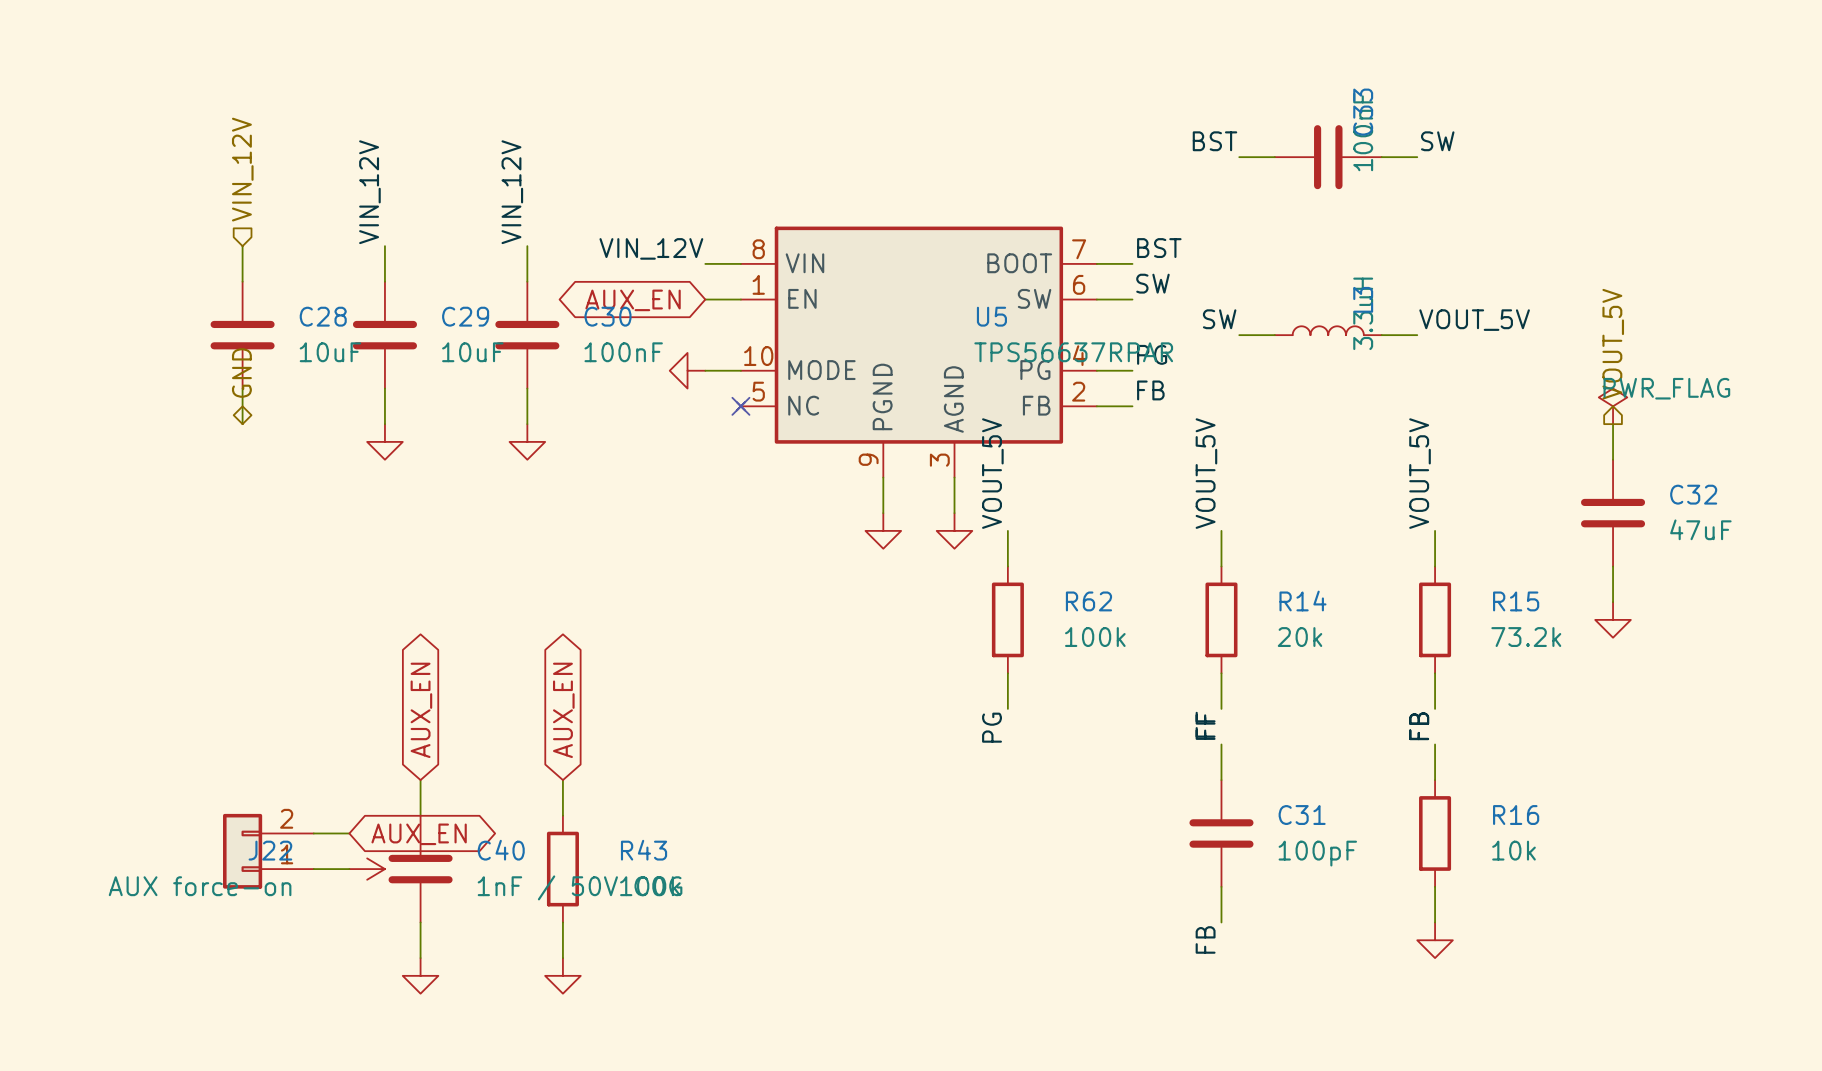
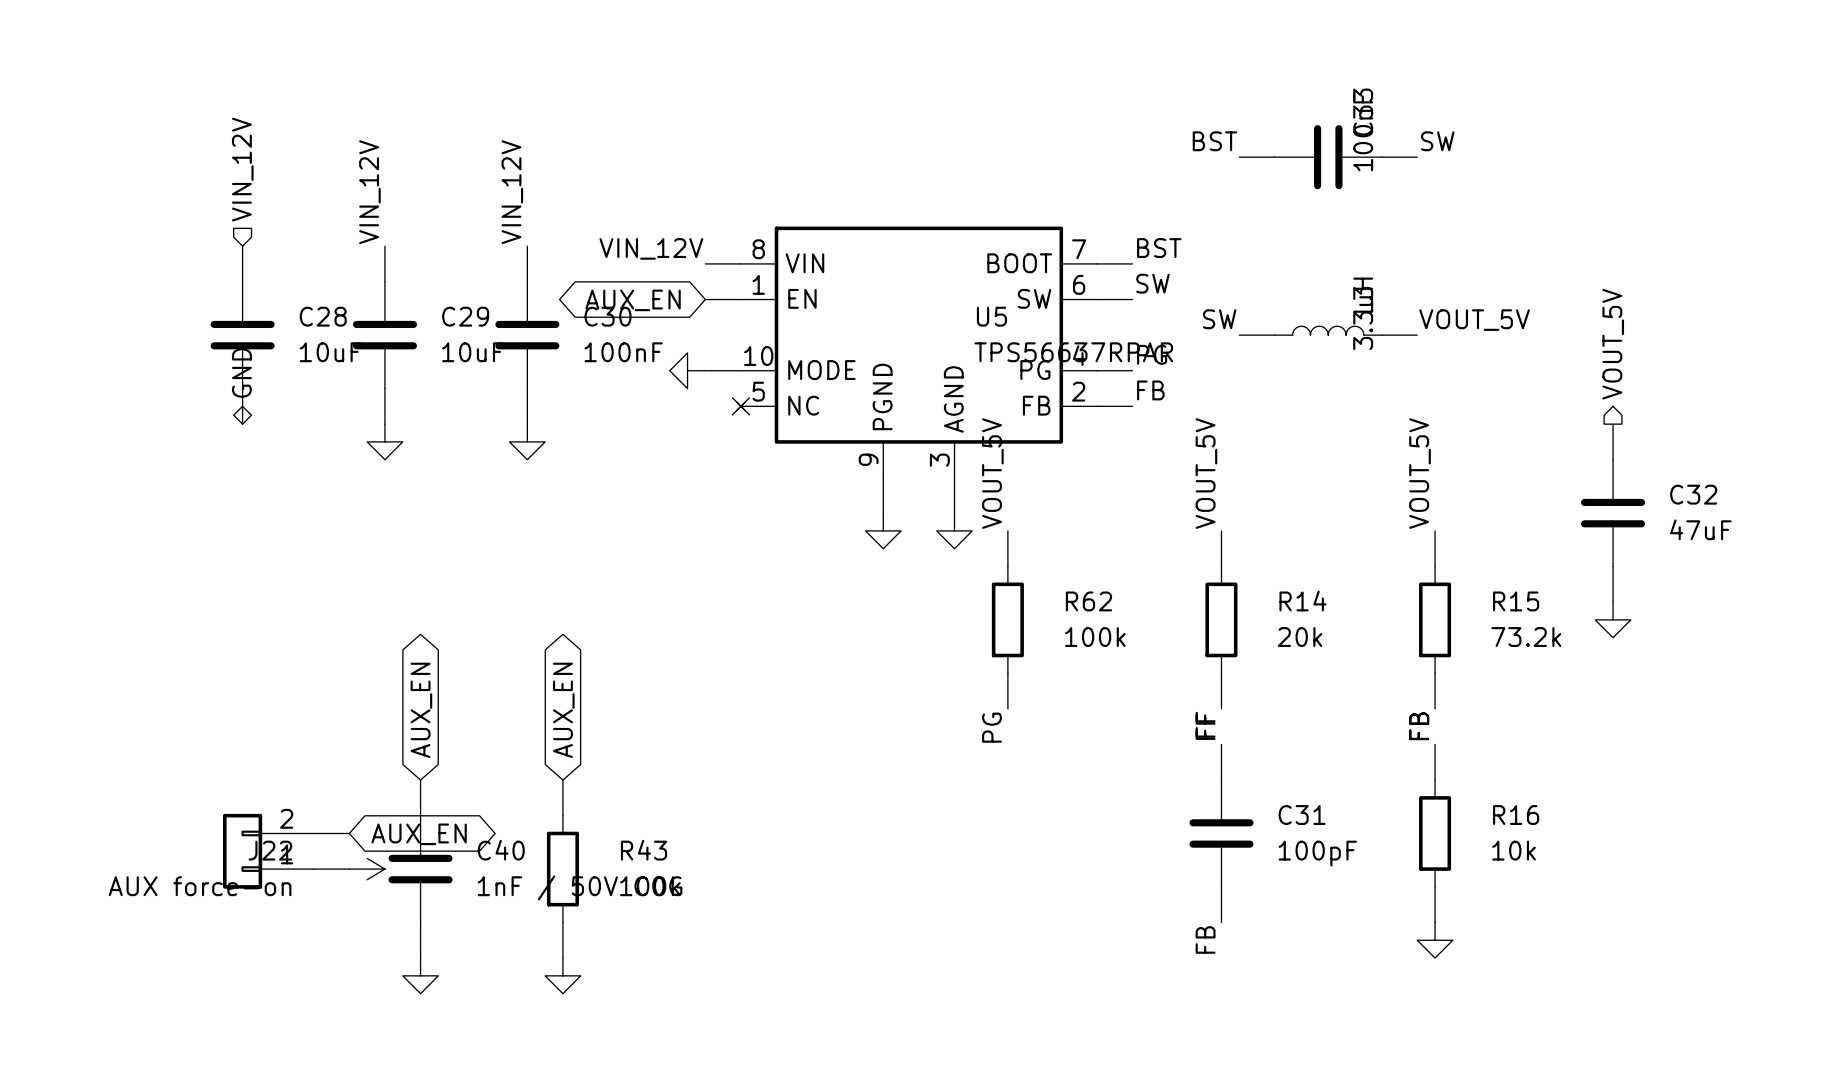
power symbol: PWR_FLAG (1613, 406) -> none

